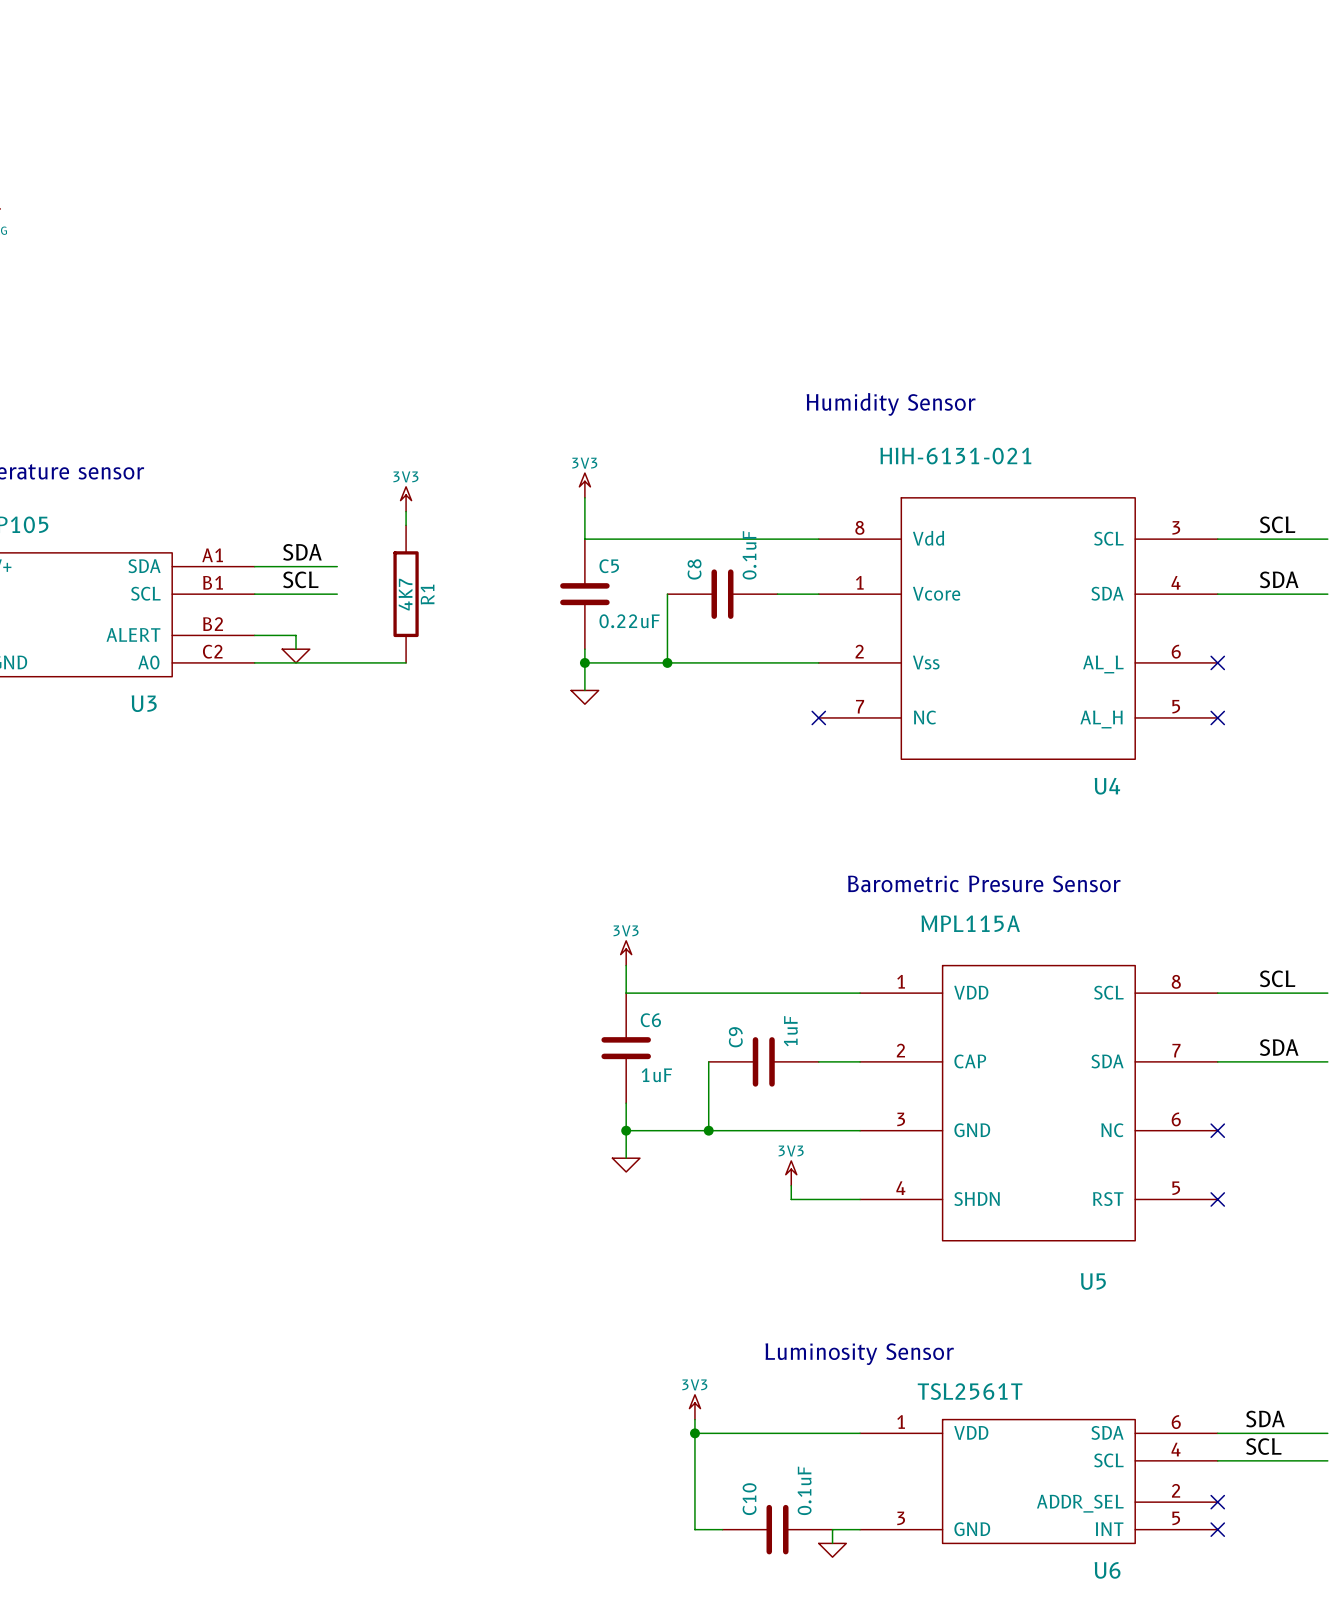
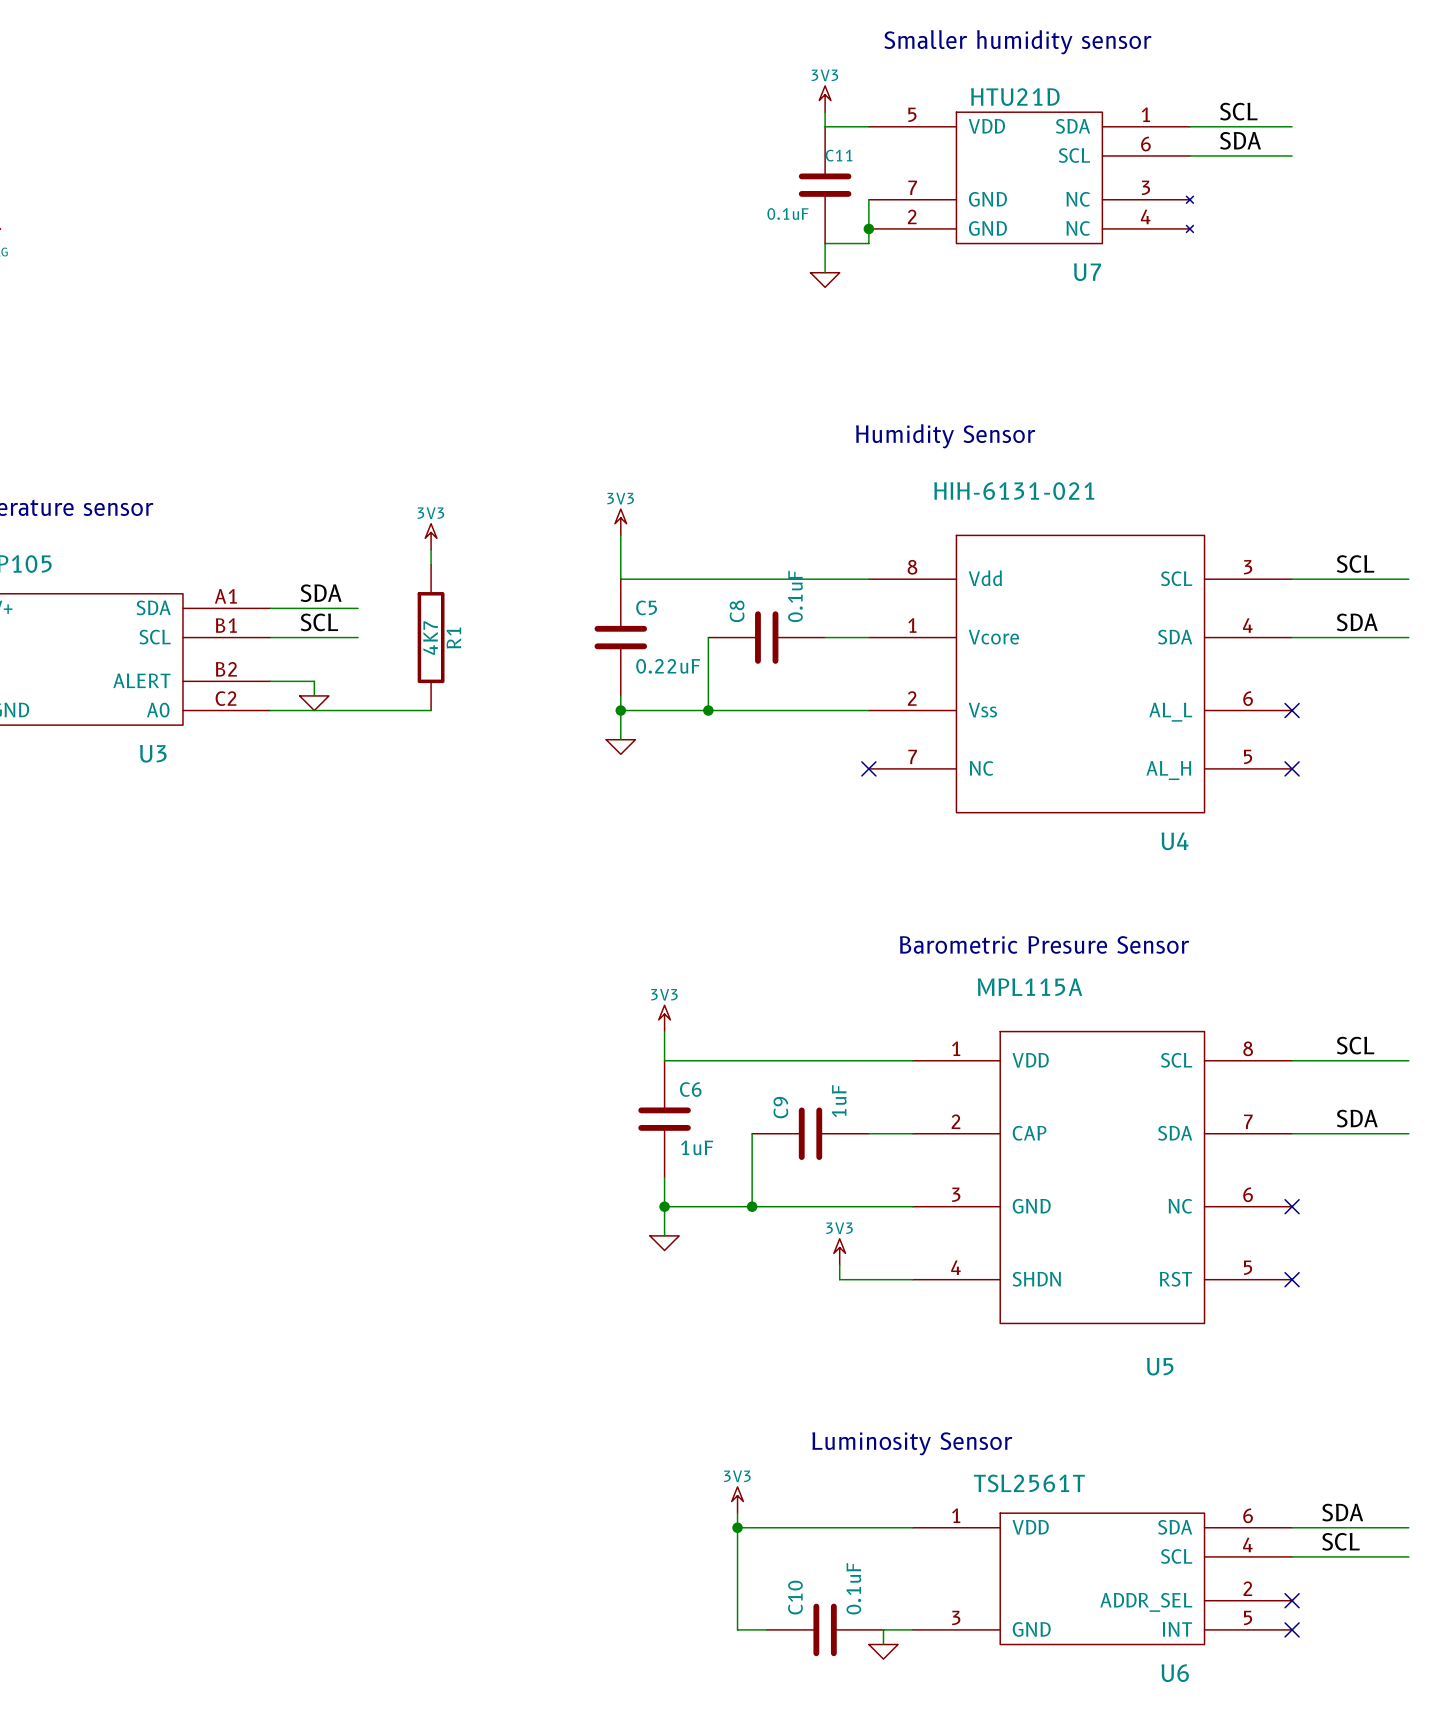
text: none -> Smaller humidity sensor (1017, 42)
power symbol: none -> 3V3 (825, 99)
wire: none -> (825, 112) (825, 126) (868, 126)
label: none -> SCL (1238, 111)
wire: none -> (1189, 126) (1292, 126)
label: none -> SDA (1240, 140)
wire: none -> (1189, 155) (1292, 155)
U7: none -> HTU21D (1031, 177)
C11: none -> 0.1uF (825, 185)
wire: none -> (868, 199) (868, 243) (825, 243) (825, 272)
junction: none -> (868, 228)
power symbol: none -> (825, 280)

